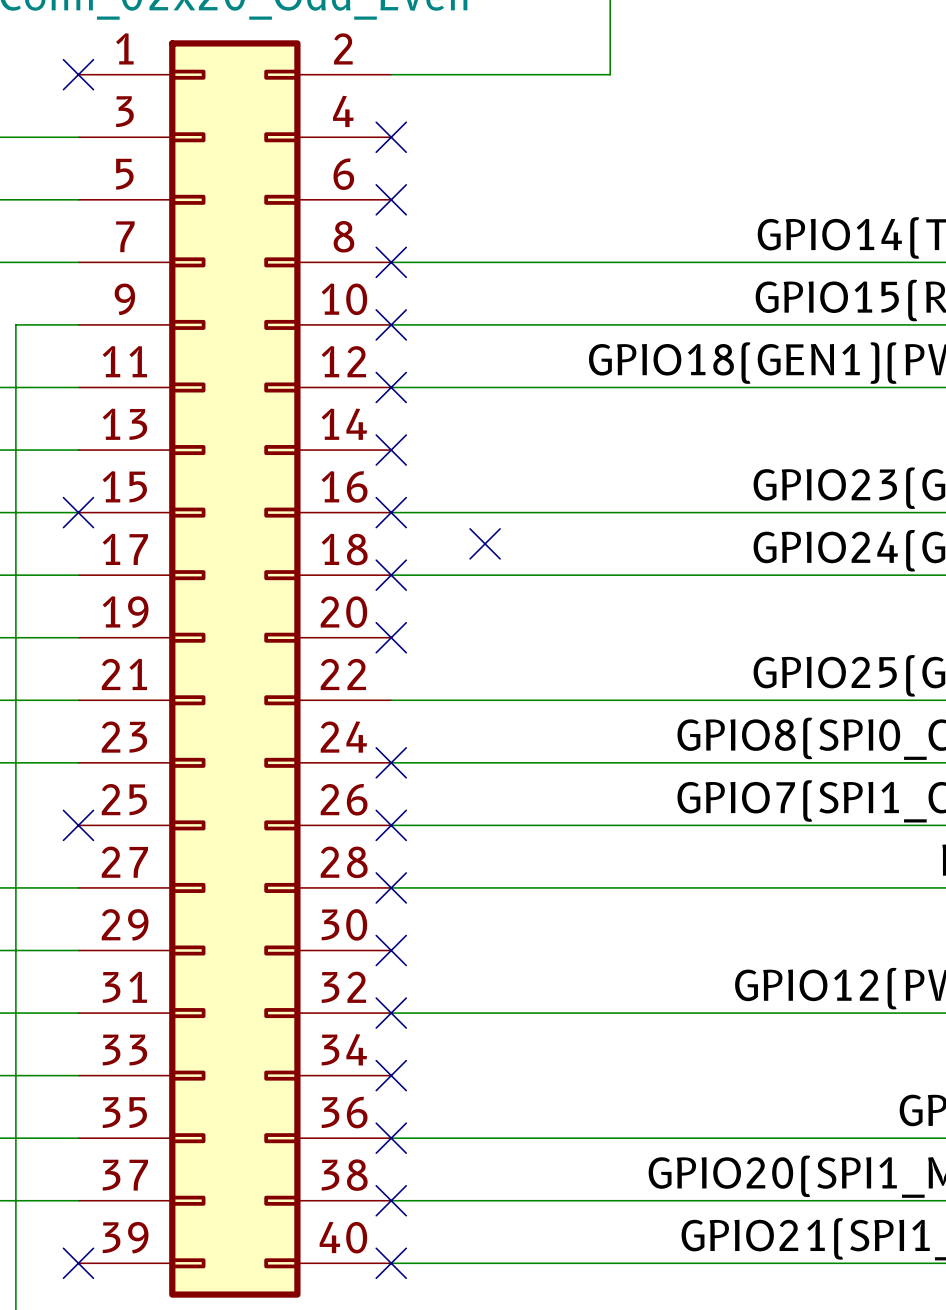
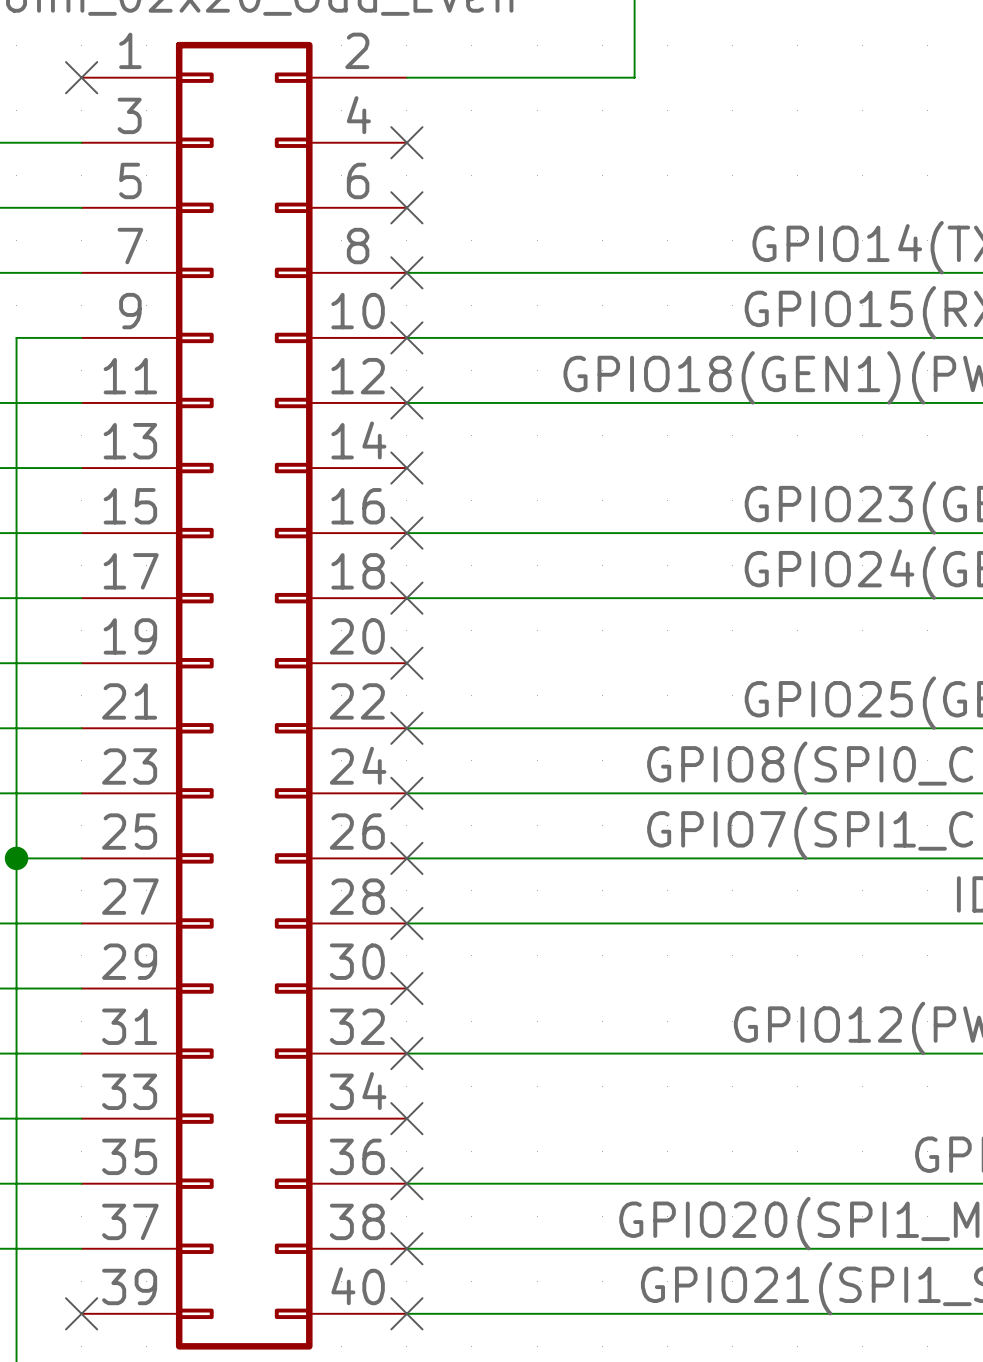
no-connect mark: (78, 512) -> none
no-connect mark: (485, 543) -> none
no-connect mark: none -> (406, 728)
wire: none -> (16, 858) (81, 858)
junction: none -> (16, 858)
no-connect mark: (78, 825) -> none

